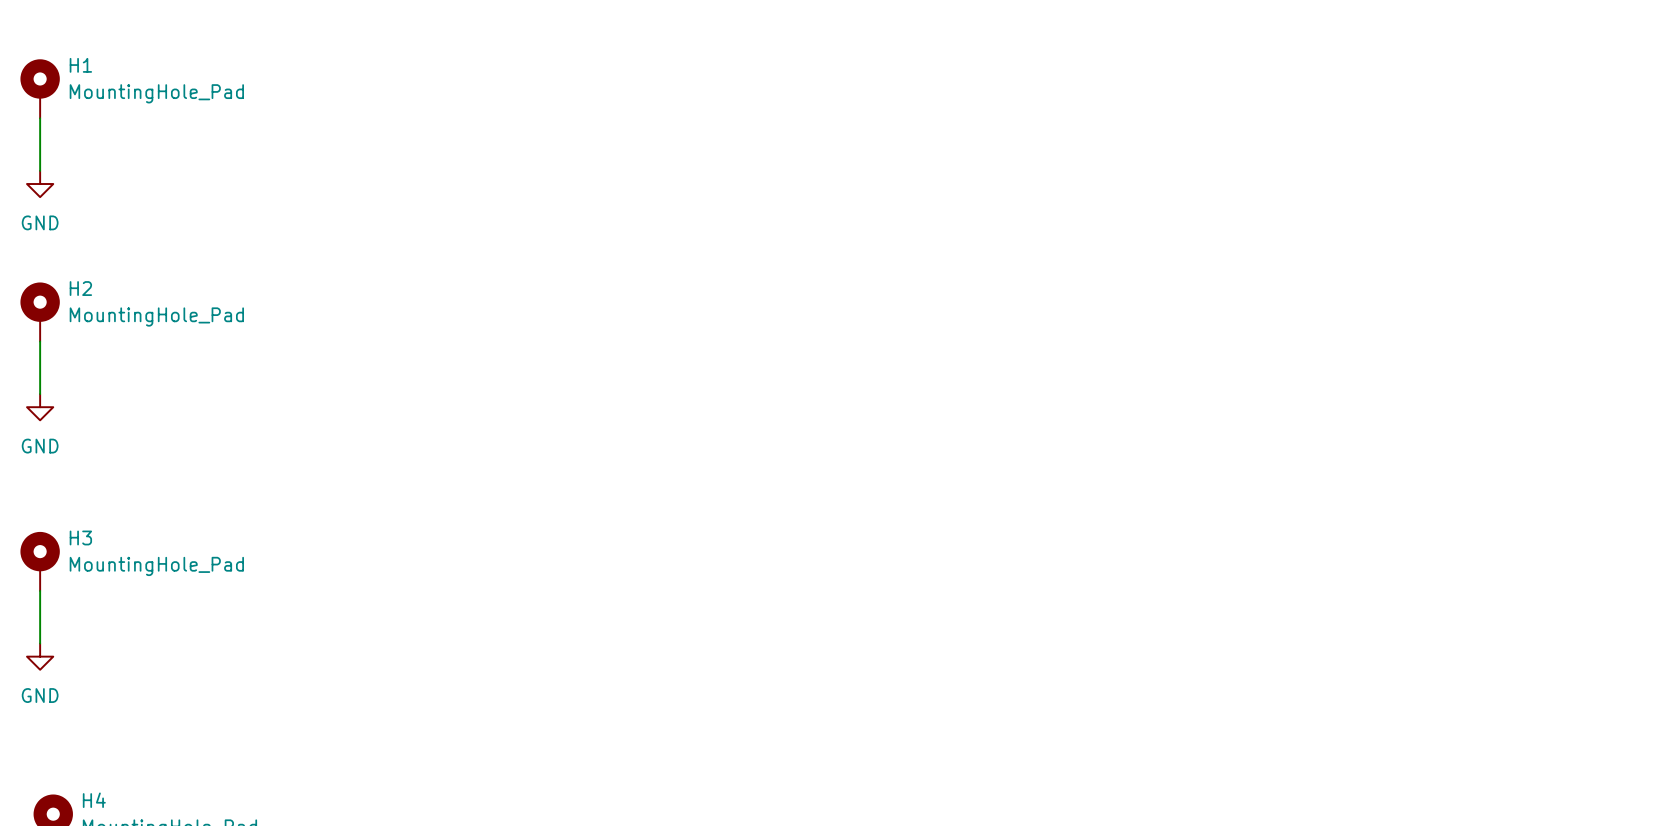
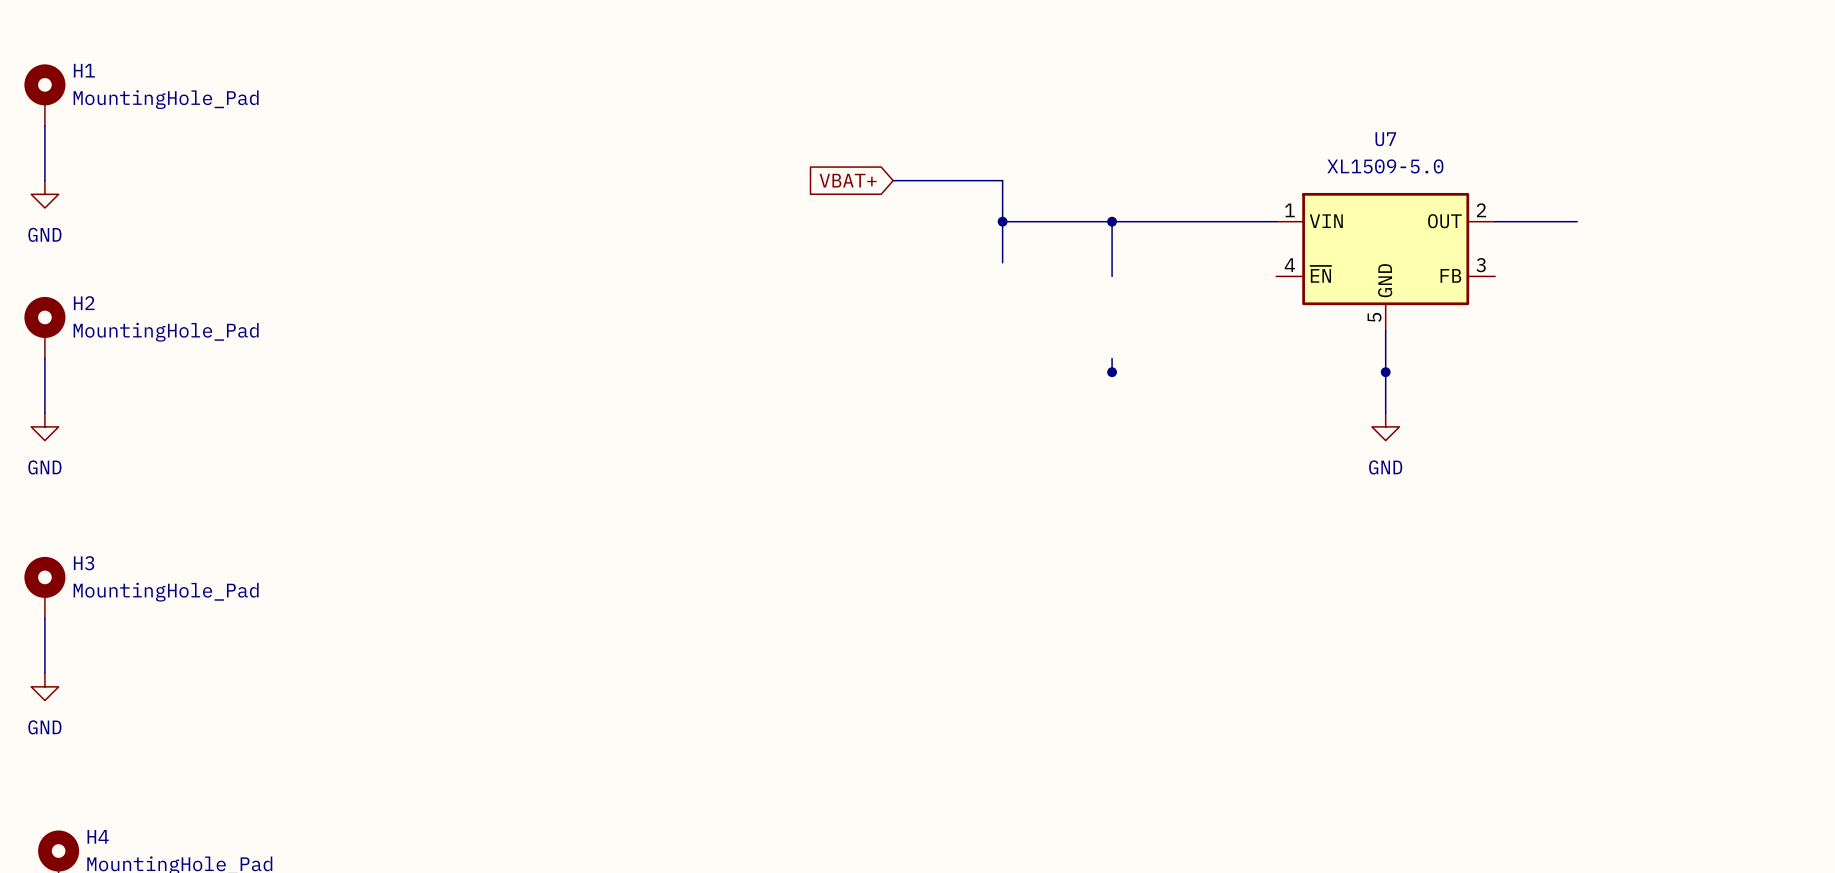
global label: none -> VBAT+ (848, 180)
wire: none -> (893, 180) (1002, 180) (1002, 262)
wire: none -> (1002, 221) (1276, 221)
junction: none -> (1002, 221)
wire: none -> (1112, 221) (1112, 276)
junction: none -> (1112, 221)
wire: none -> (1495, 221) (1577, 221)
U7: none -> XL1509-5.0 (1385, 262)
wire: none -> (1385, 331) (1385, 413)
wire: none -> (1112, 358) (1112, 372)
junction: none -> (1112, 372)
junction: none -> (1385, 372)
power symbol: none -> GND (1385, 426)

